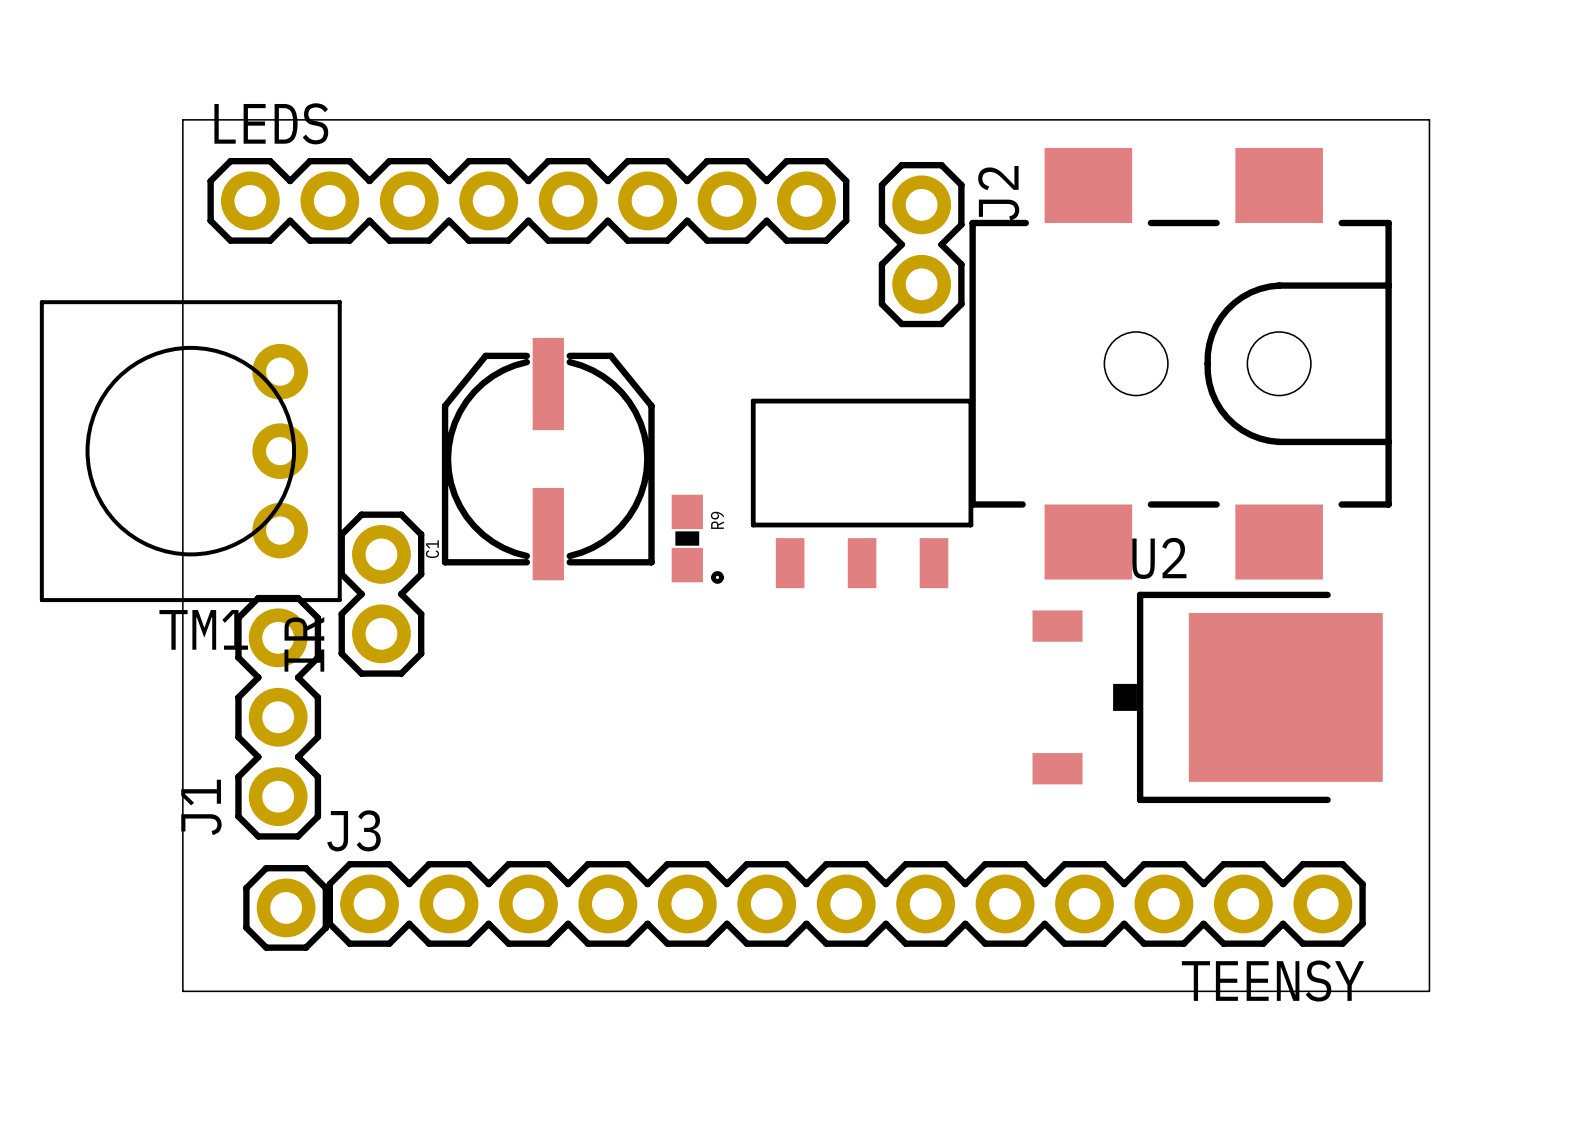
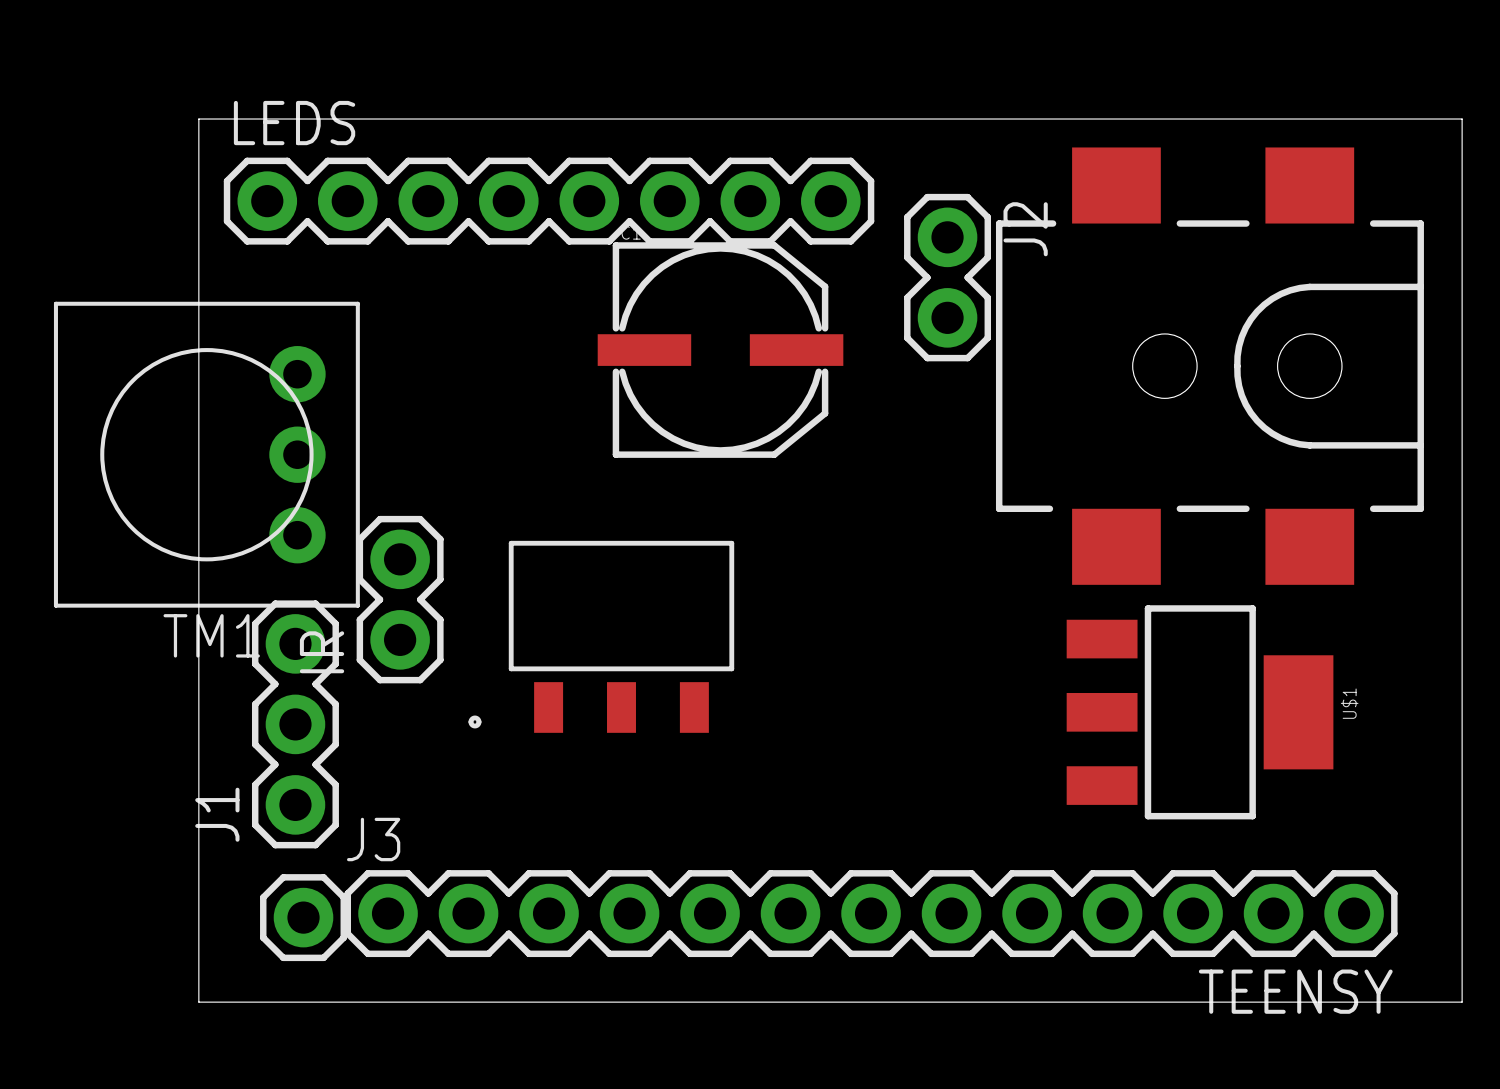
J2 position: (921, 244) -> (947, 277)
C1 rotation: 0° (548, 459) -> 90° clockwise (720, 350)
C1 position: (548, 459) -> (720, 350)
part position: (842, 493) -> (601, 636)
R9: (687, 538) -> none
U2: (1207, 697) -> none
U$1: none -> (1200, 712)

